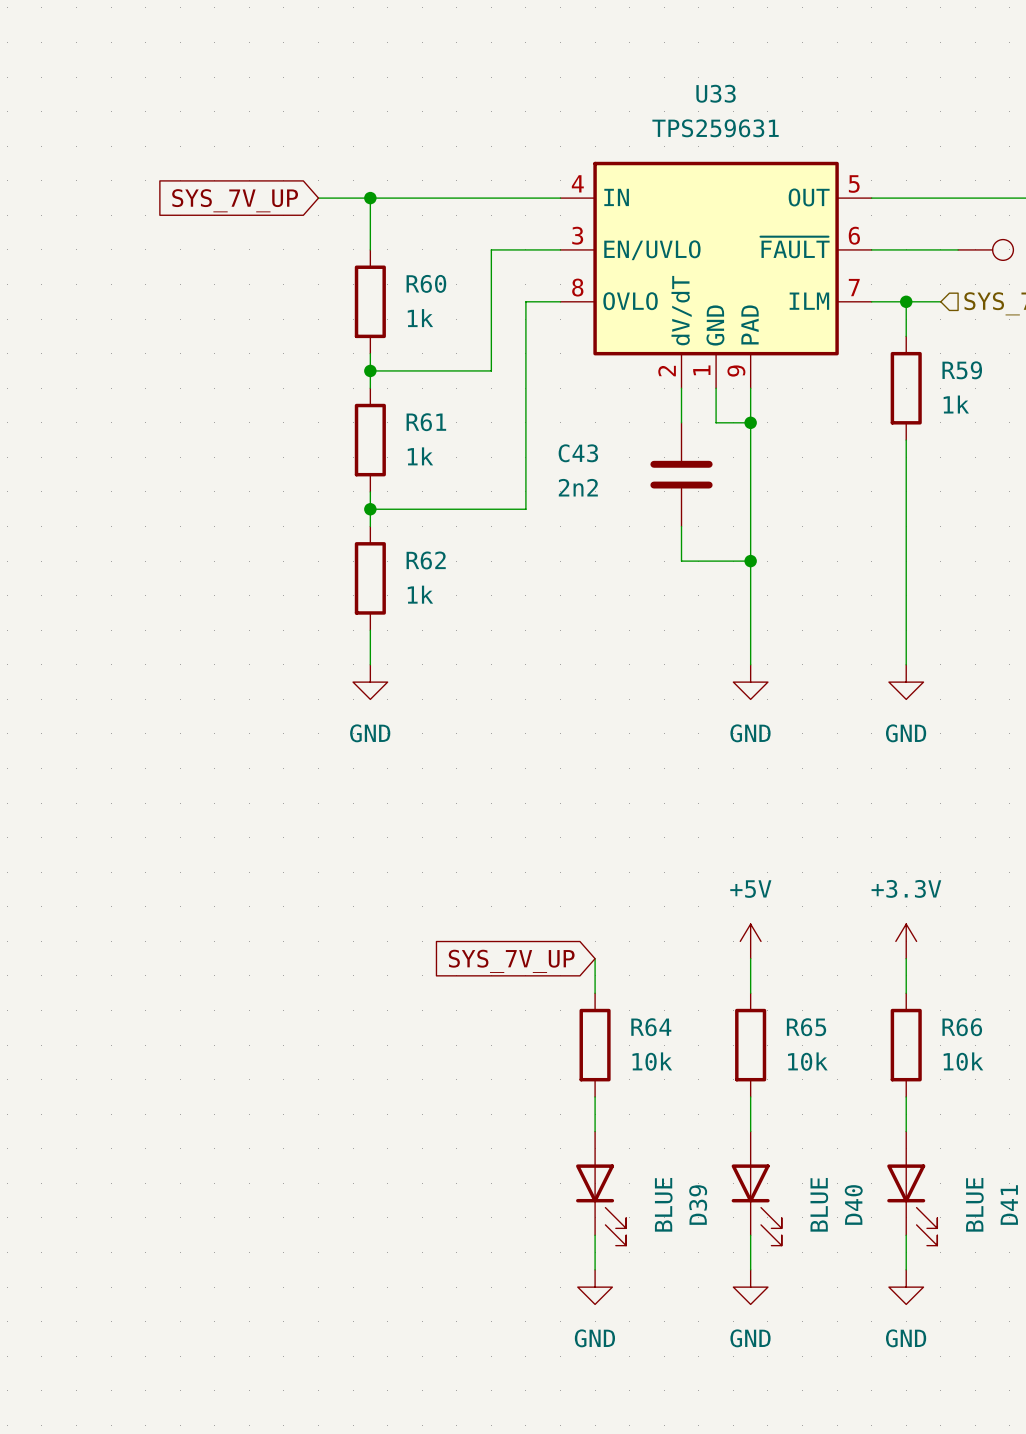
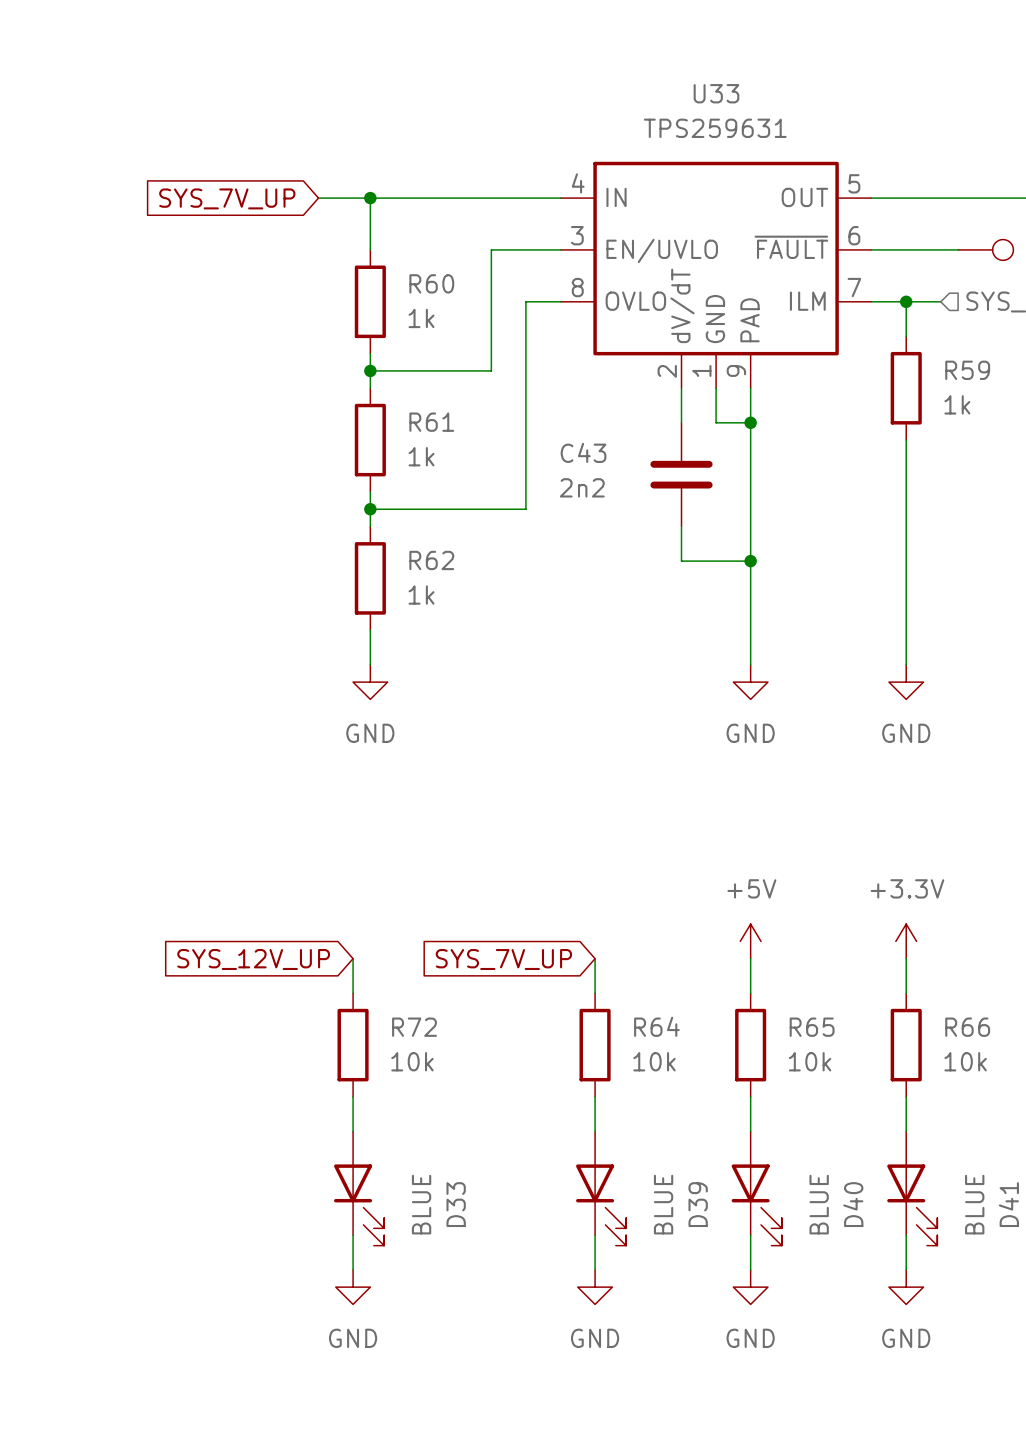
wire: none -> (353, 958) (353, 993)
global label: none -> SYS_12V_UP (253, 959)
R72: none -> 10k (353, 1045)
wire: none -> (353, 1096) (353, 1131)
D33: none -> BLUE (359, 1188)
wire: none -> (353, 1235) (353, 1269)
power symbol: none -> GND (353, 1287)

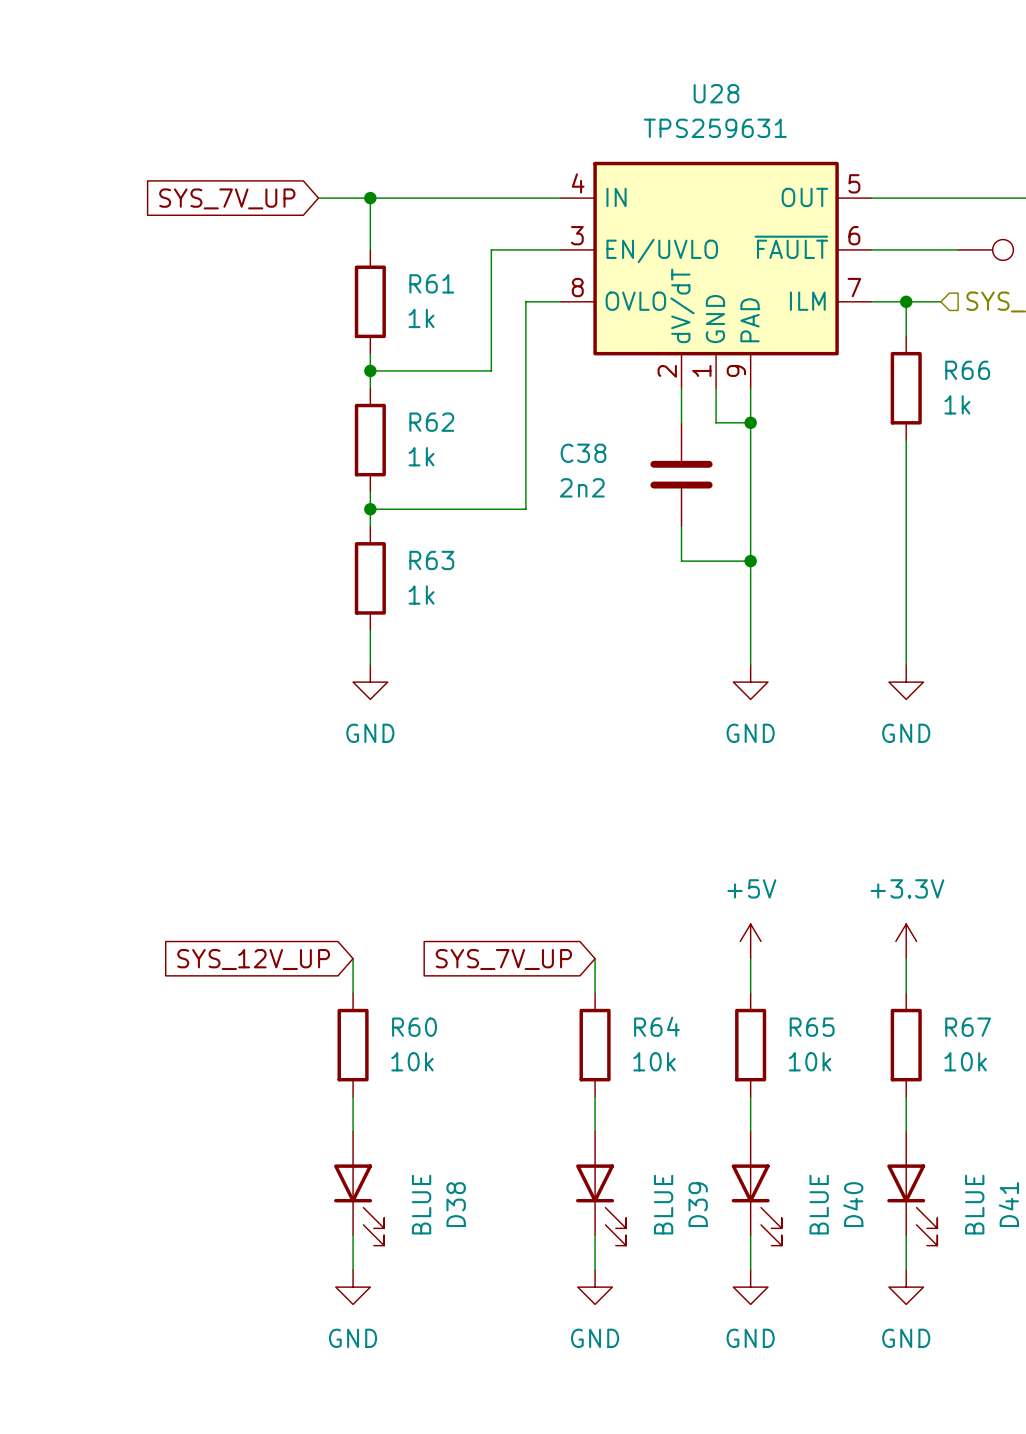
U33 name: U33 (716, 93) -> U28 (716, 93)
R60 name: R60 (431, 283) -> R61 (431, 283)
R59 name: R59 (967, 370) -> R66 (967, 370)
R61 name: R61 (431, 422) -> R62 (431, 422)
C43 name: C43 (583, 452) -> C38 (583, 453)
R62 name: R62 (431, 560) -> R63 (431, 560)
R72 name: R72 (414, 1027) -> R60 (414, 1027)
R66 name: R66 (967, 1027) -> R67 (968, 1027)
D33 name: D33 (456, 1204) -> D38 (456, 1204)

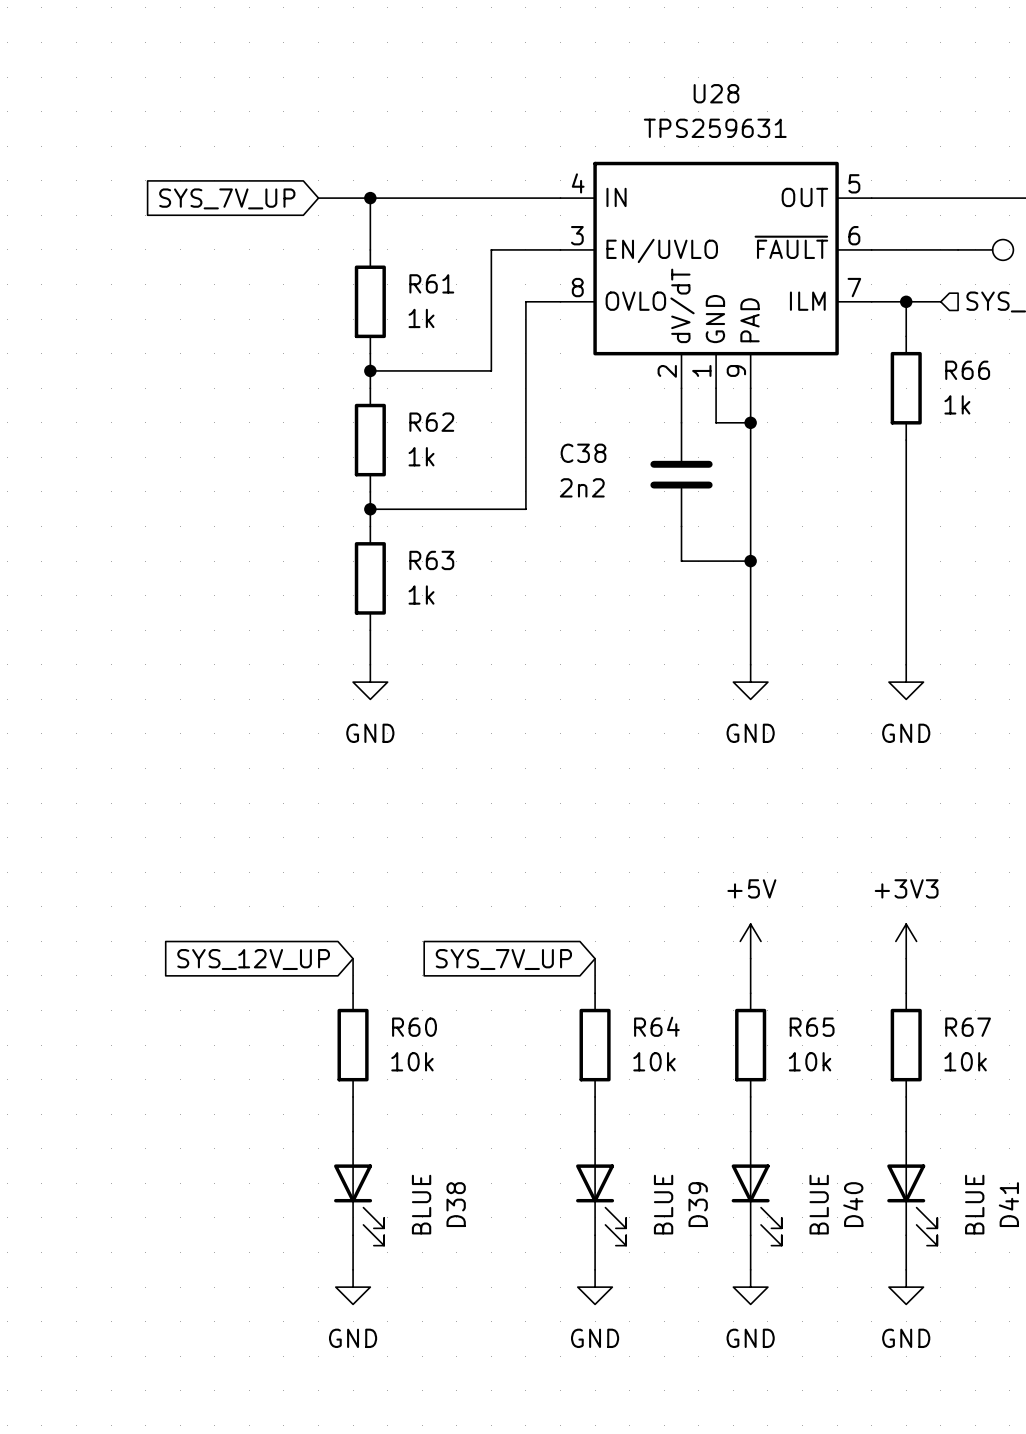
power symbol: +3.3V (906, 941) -> +3V3 (906, 941)

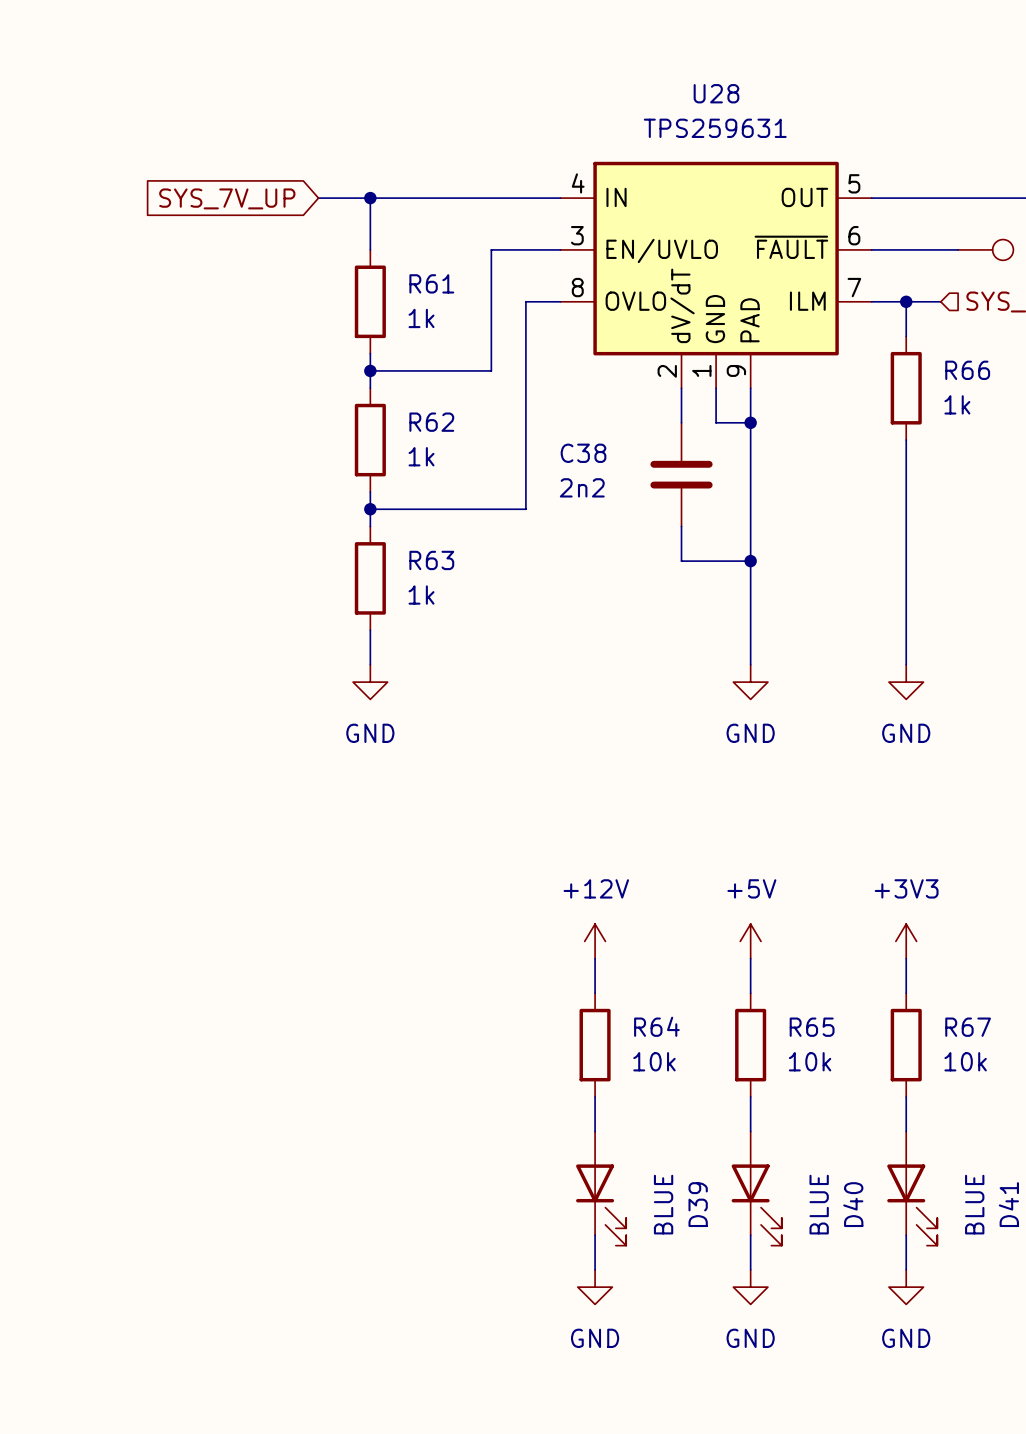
power symbol: none -> +12V (595, 941)
wire: (353, 958) (353, 993) -> none
global label: SYS_12V_UP (253, 959) -> none
global label: SYS_7V_UP (503, 959) -> none
R60: 10k (353, 1045) -> none
wire: (353, 1096) (353, 1131) -> none
D38: BLUE (359, 1188) -> none
wire: (353, 1235) (353, 1269) -> none
power symbol: GND (353, 1287) -> none

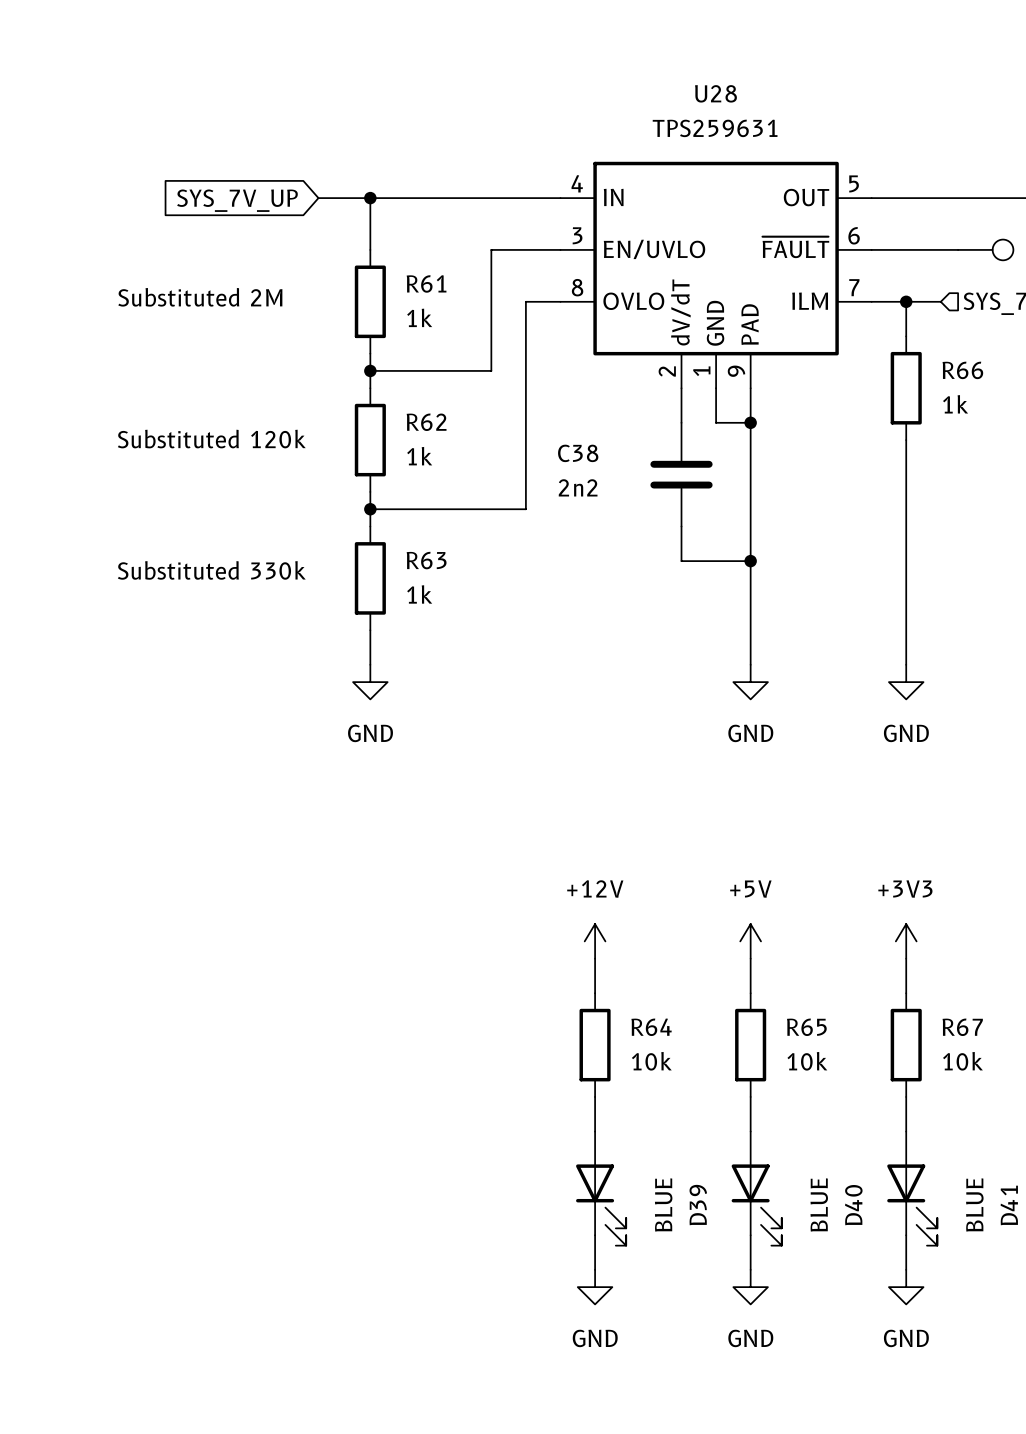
text: none -> Substituted 2M (200, 297)
text: none -> Substituted 120k (211, 439)
text: none -> Substituted 330k (211, 570)

